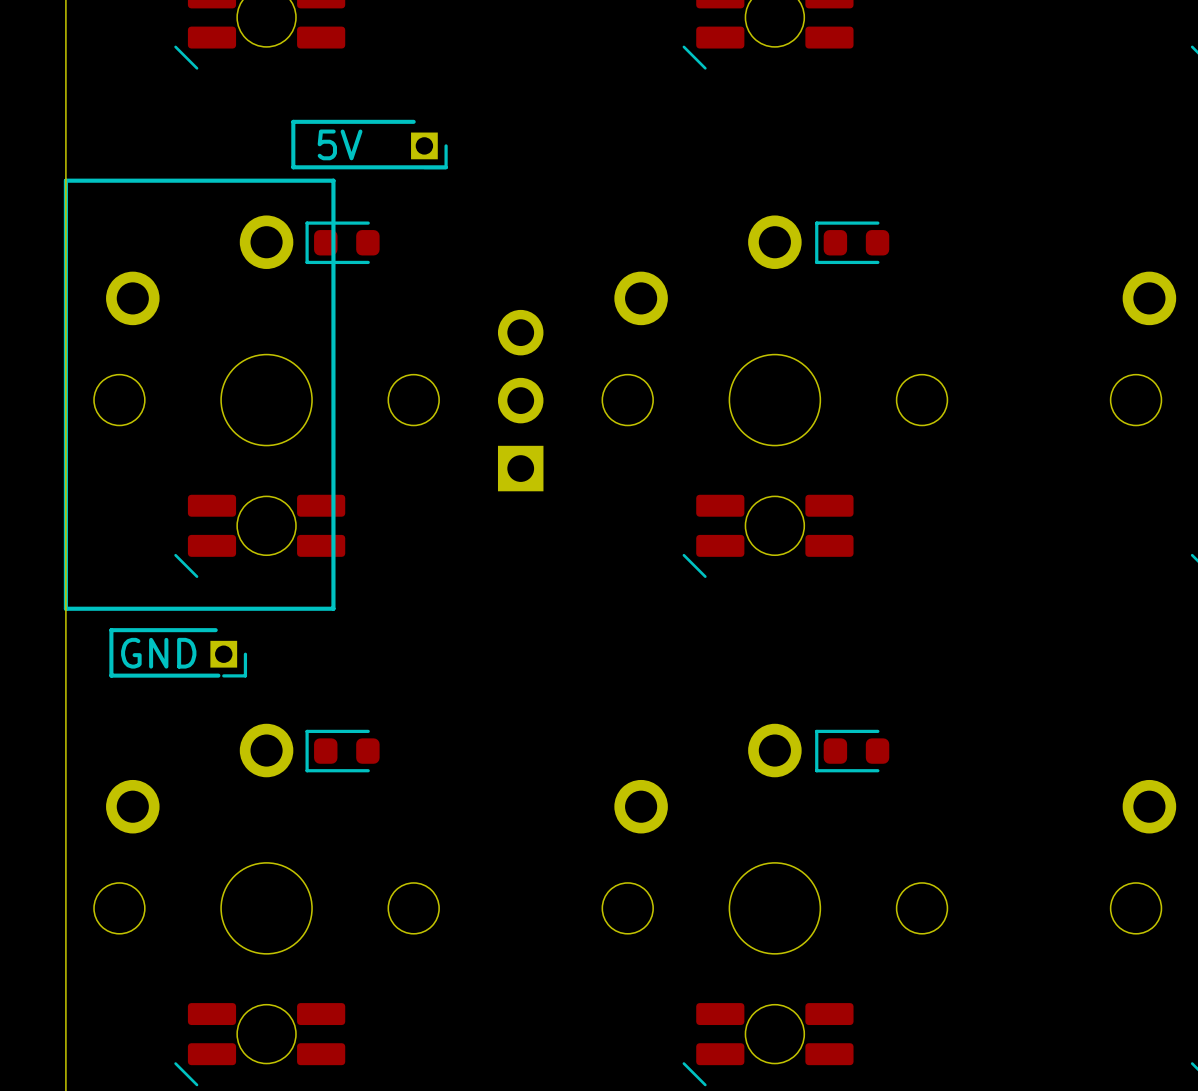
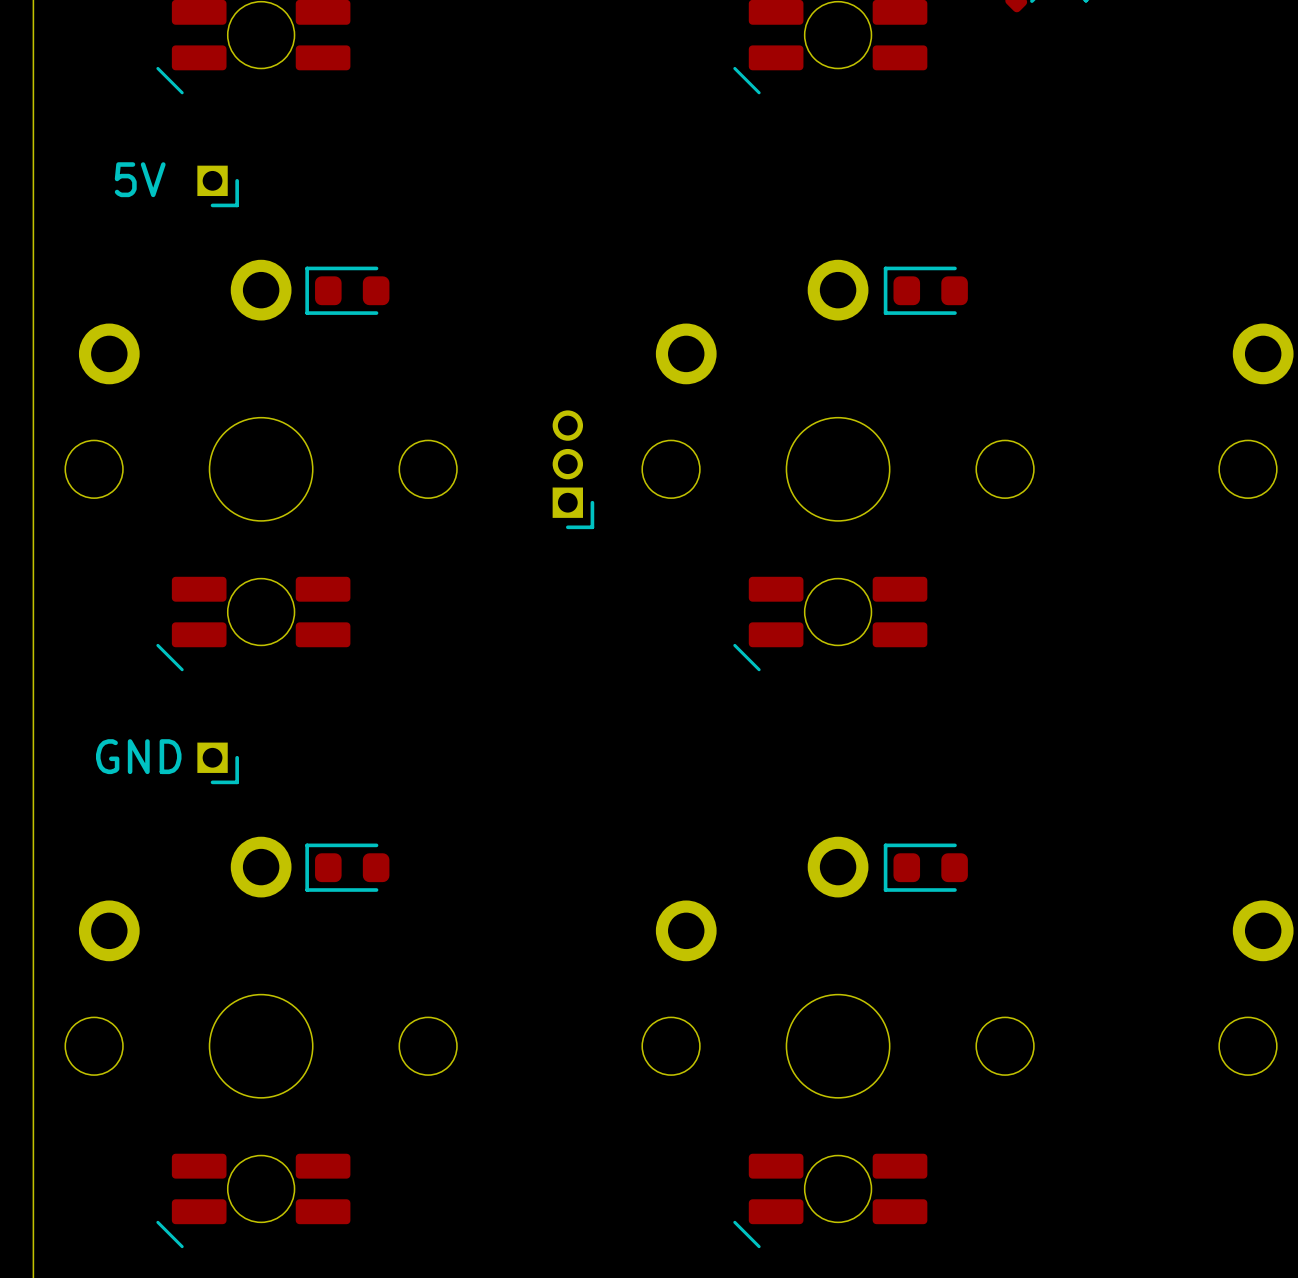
line: (413, 121) (293, 121) (293, 167) (445, 167) -> none
5V name position: 5V (340, 144) -> 5V (140, 179)
5V position: (429, 150) -> (218, 186)
line: (65, 180) (333, 180) (333, 608) (65, 608) (65, 180) -> none
part footprint: [497, 309, 544, 492] -> [552, 410, 595, 530]
line: (215, 630) (111, 630) (111, 675) (218, 675) -> none

